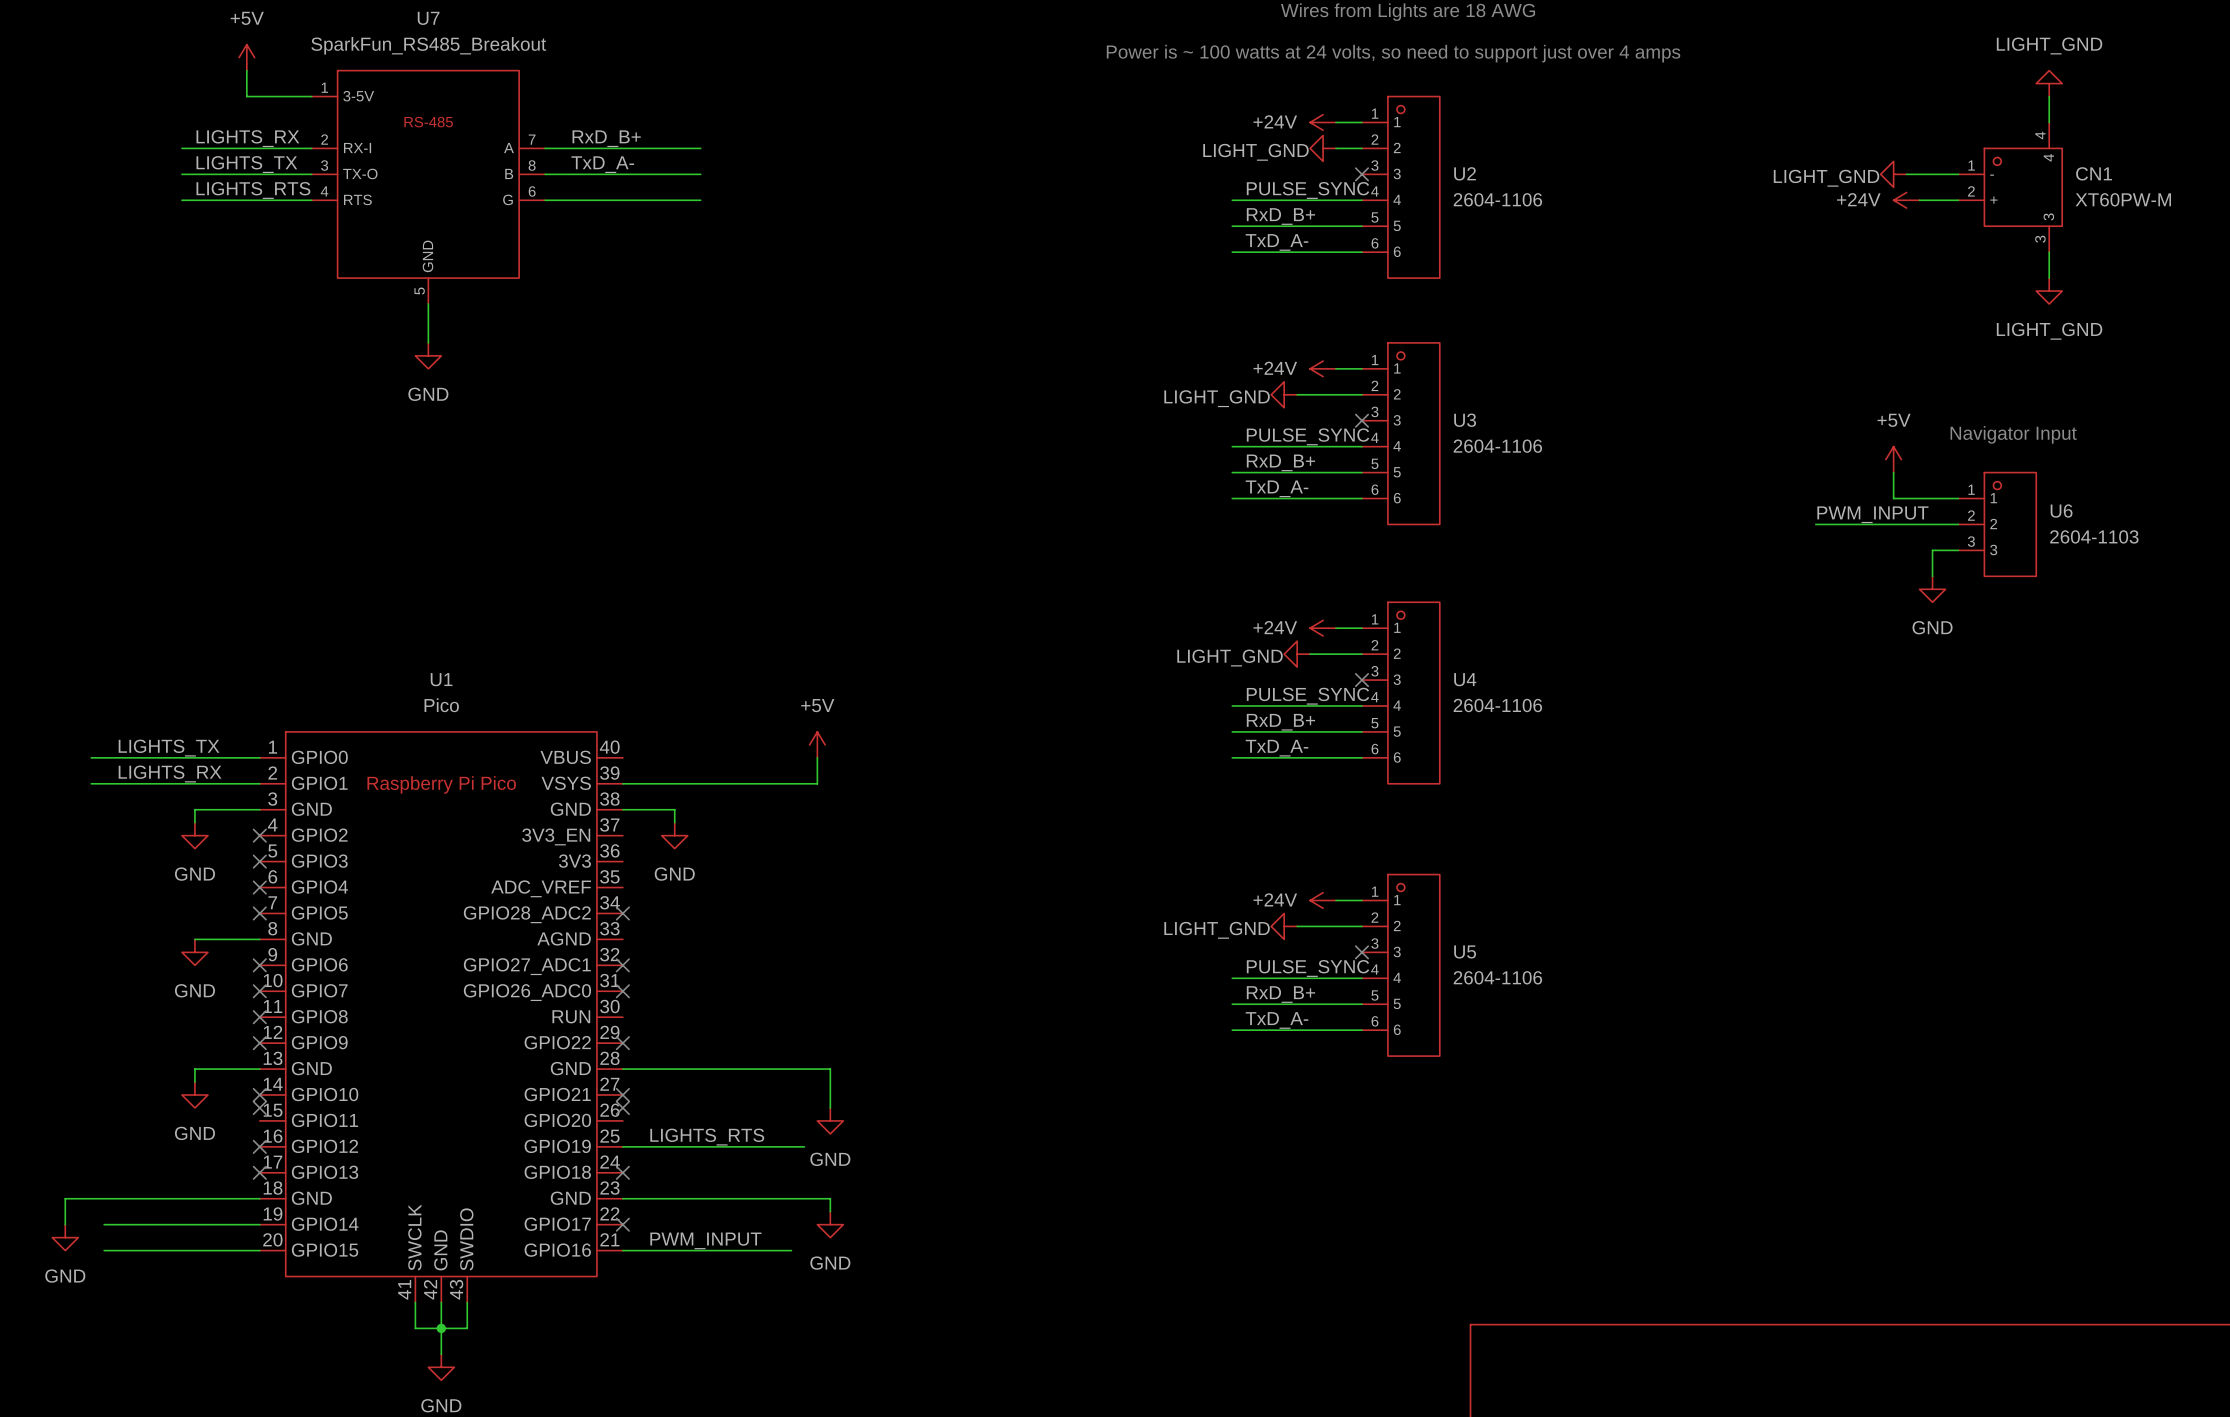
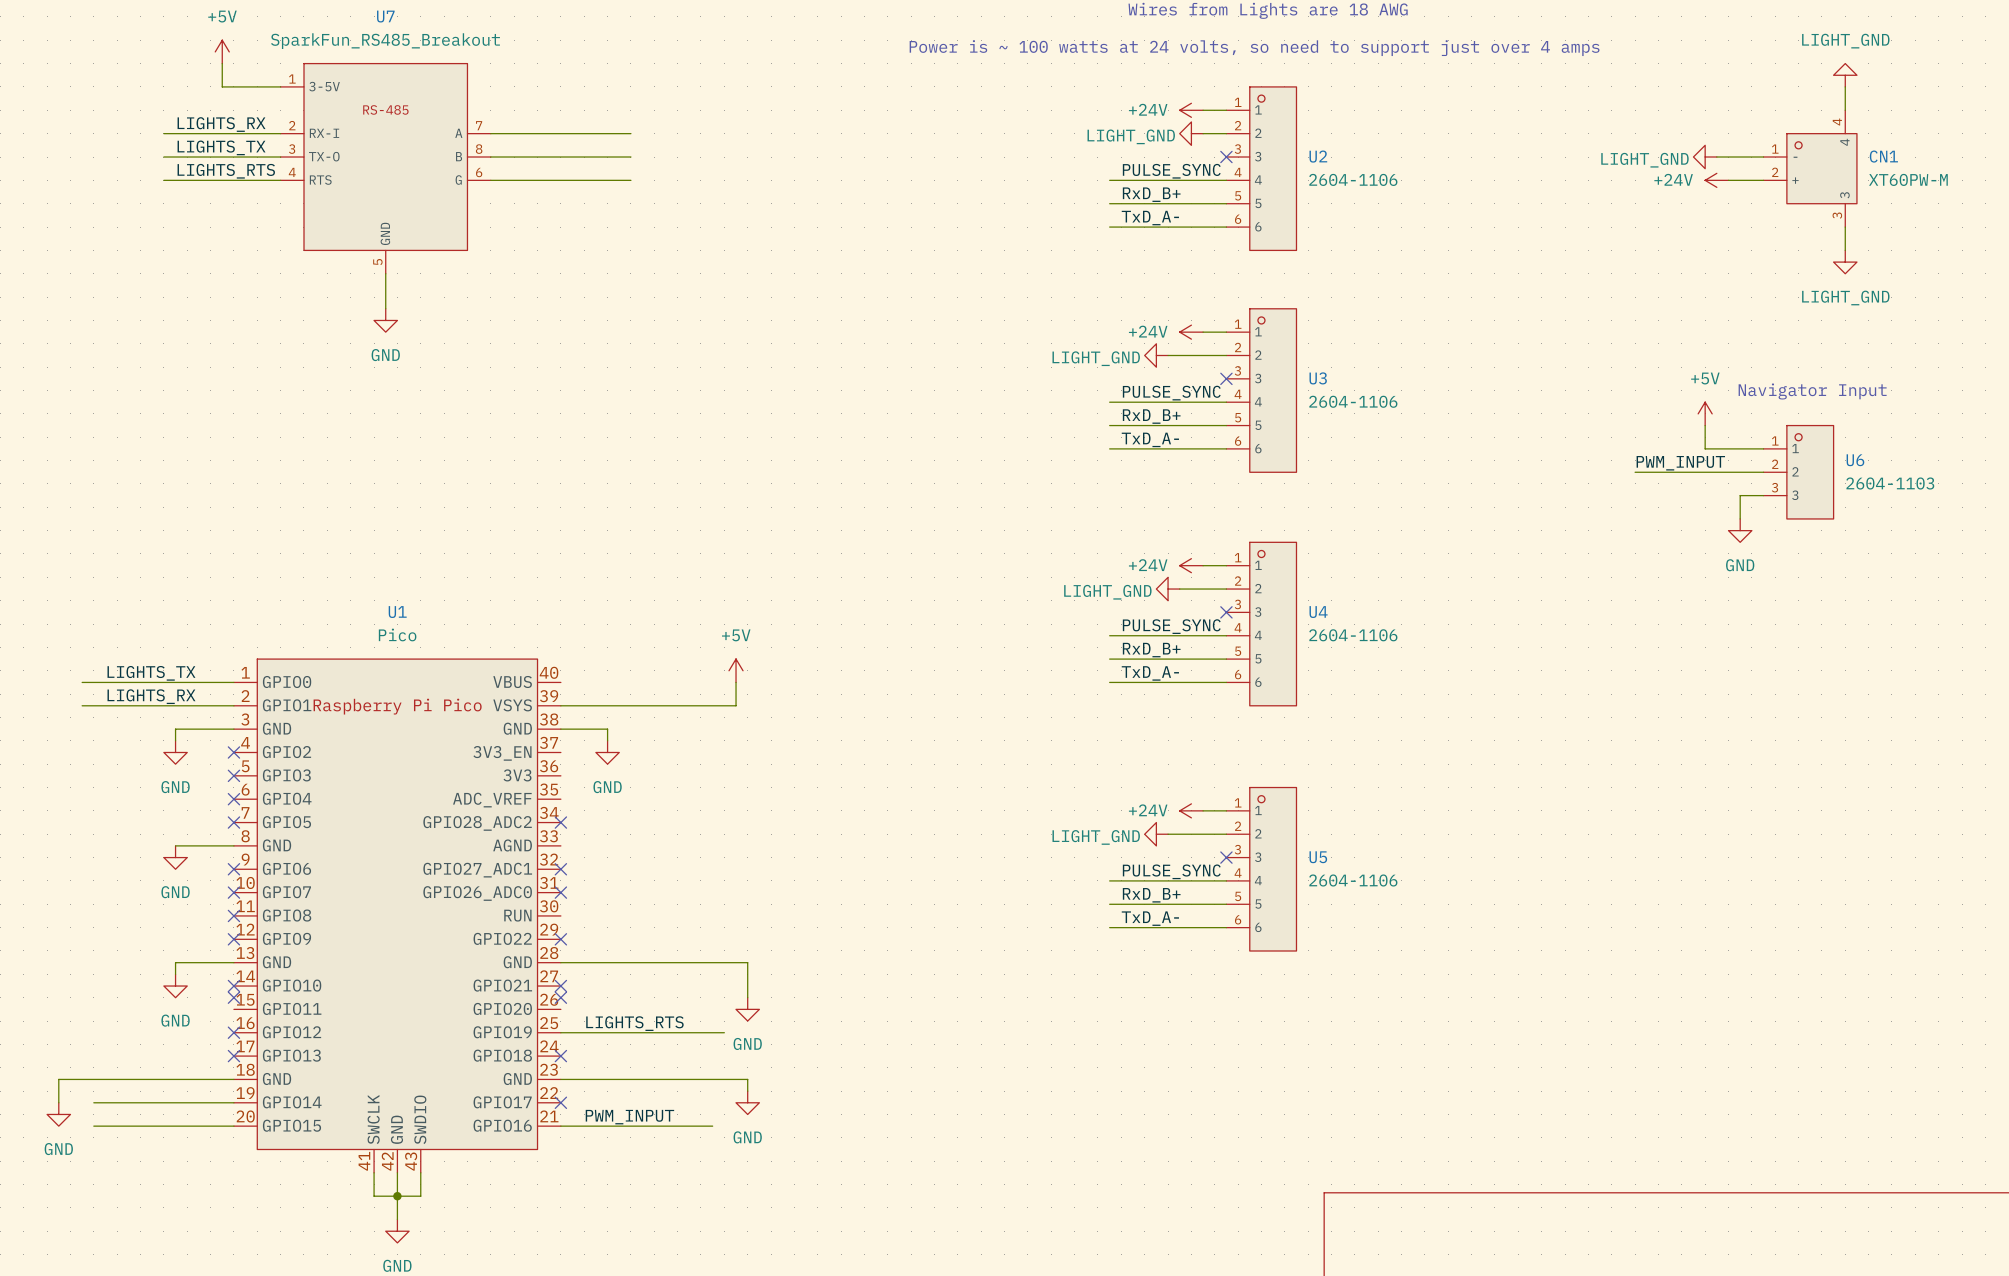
label: RxD_B+ (606, 138) -> none
label: TxD_A- (602, 164) -> none

